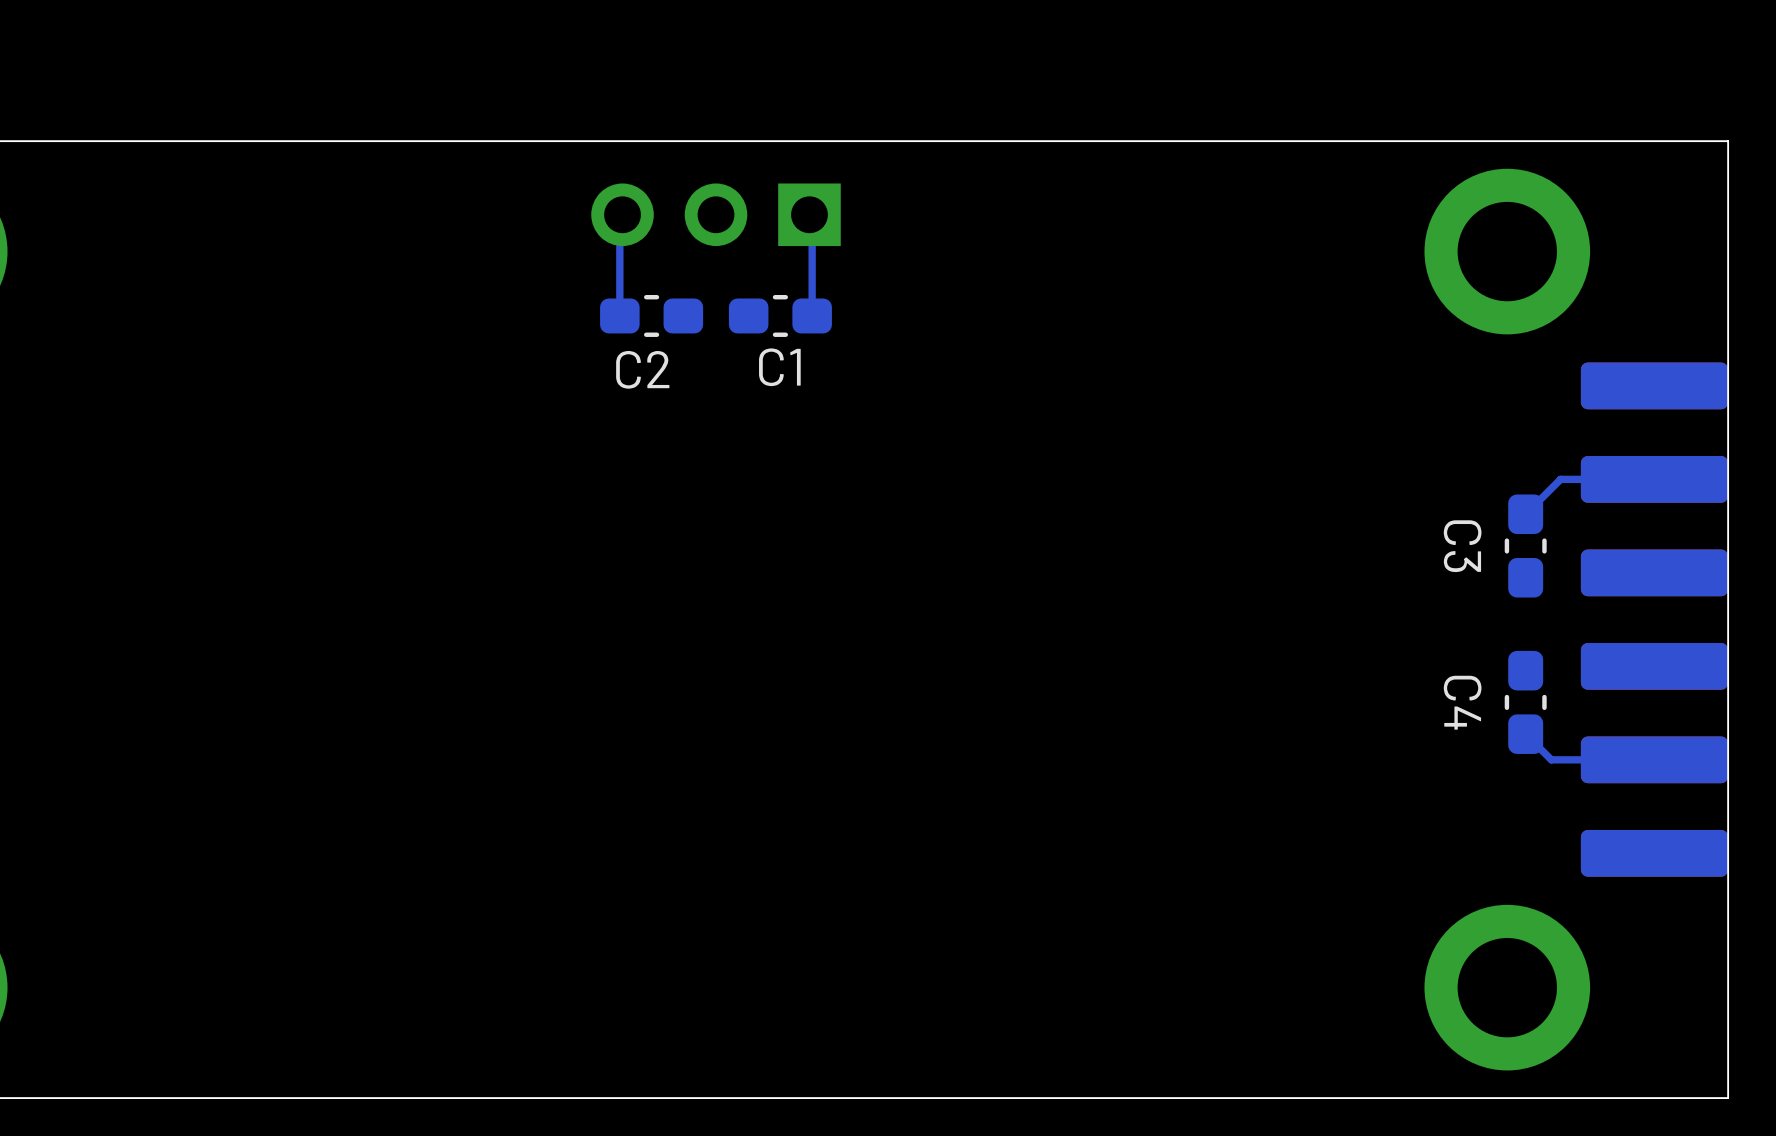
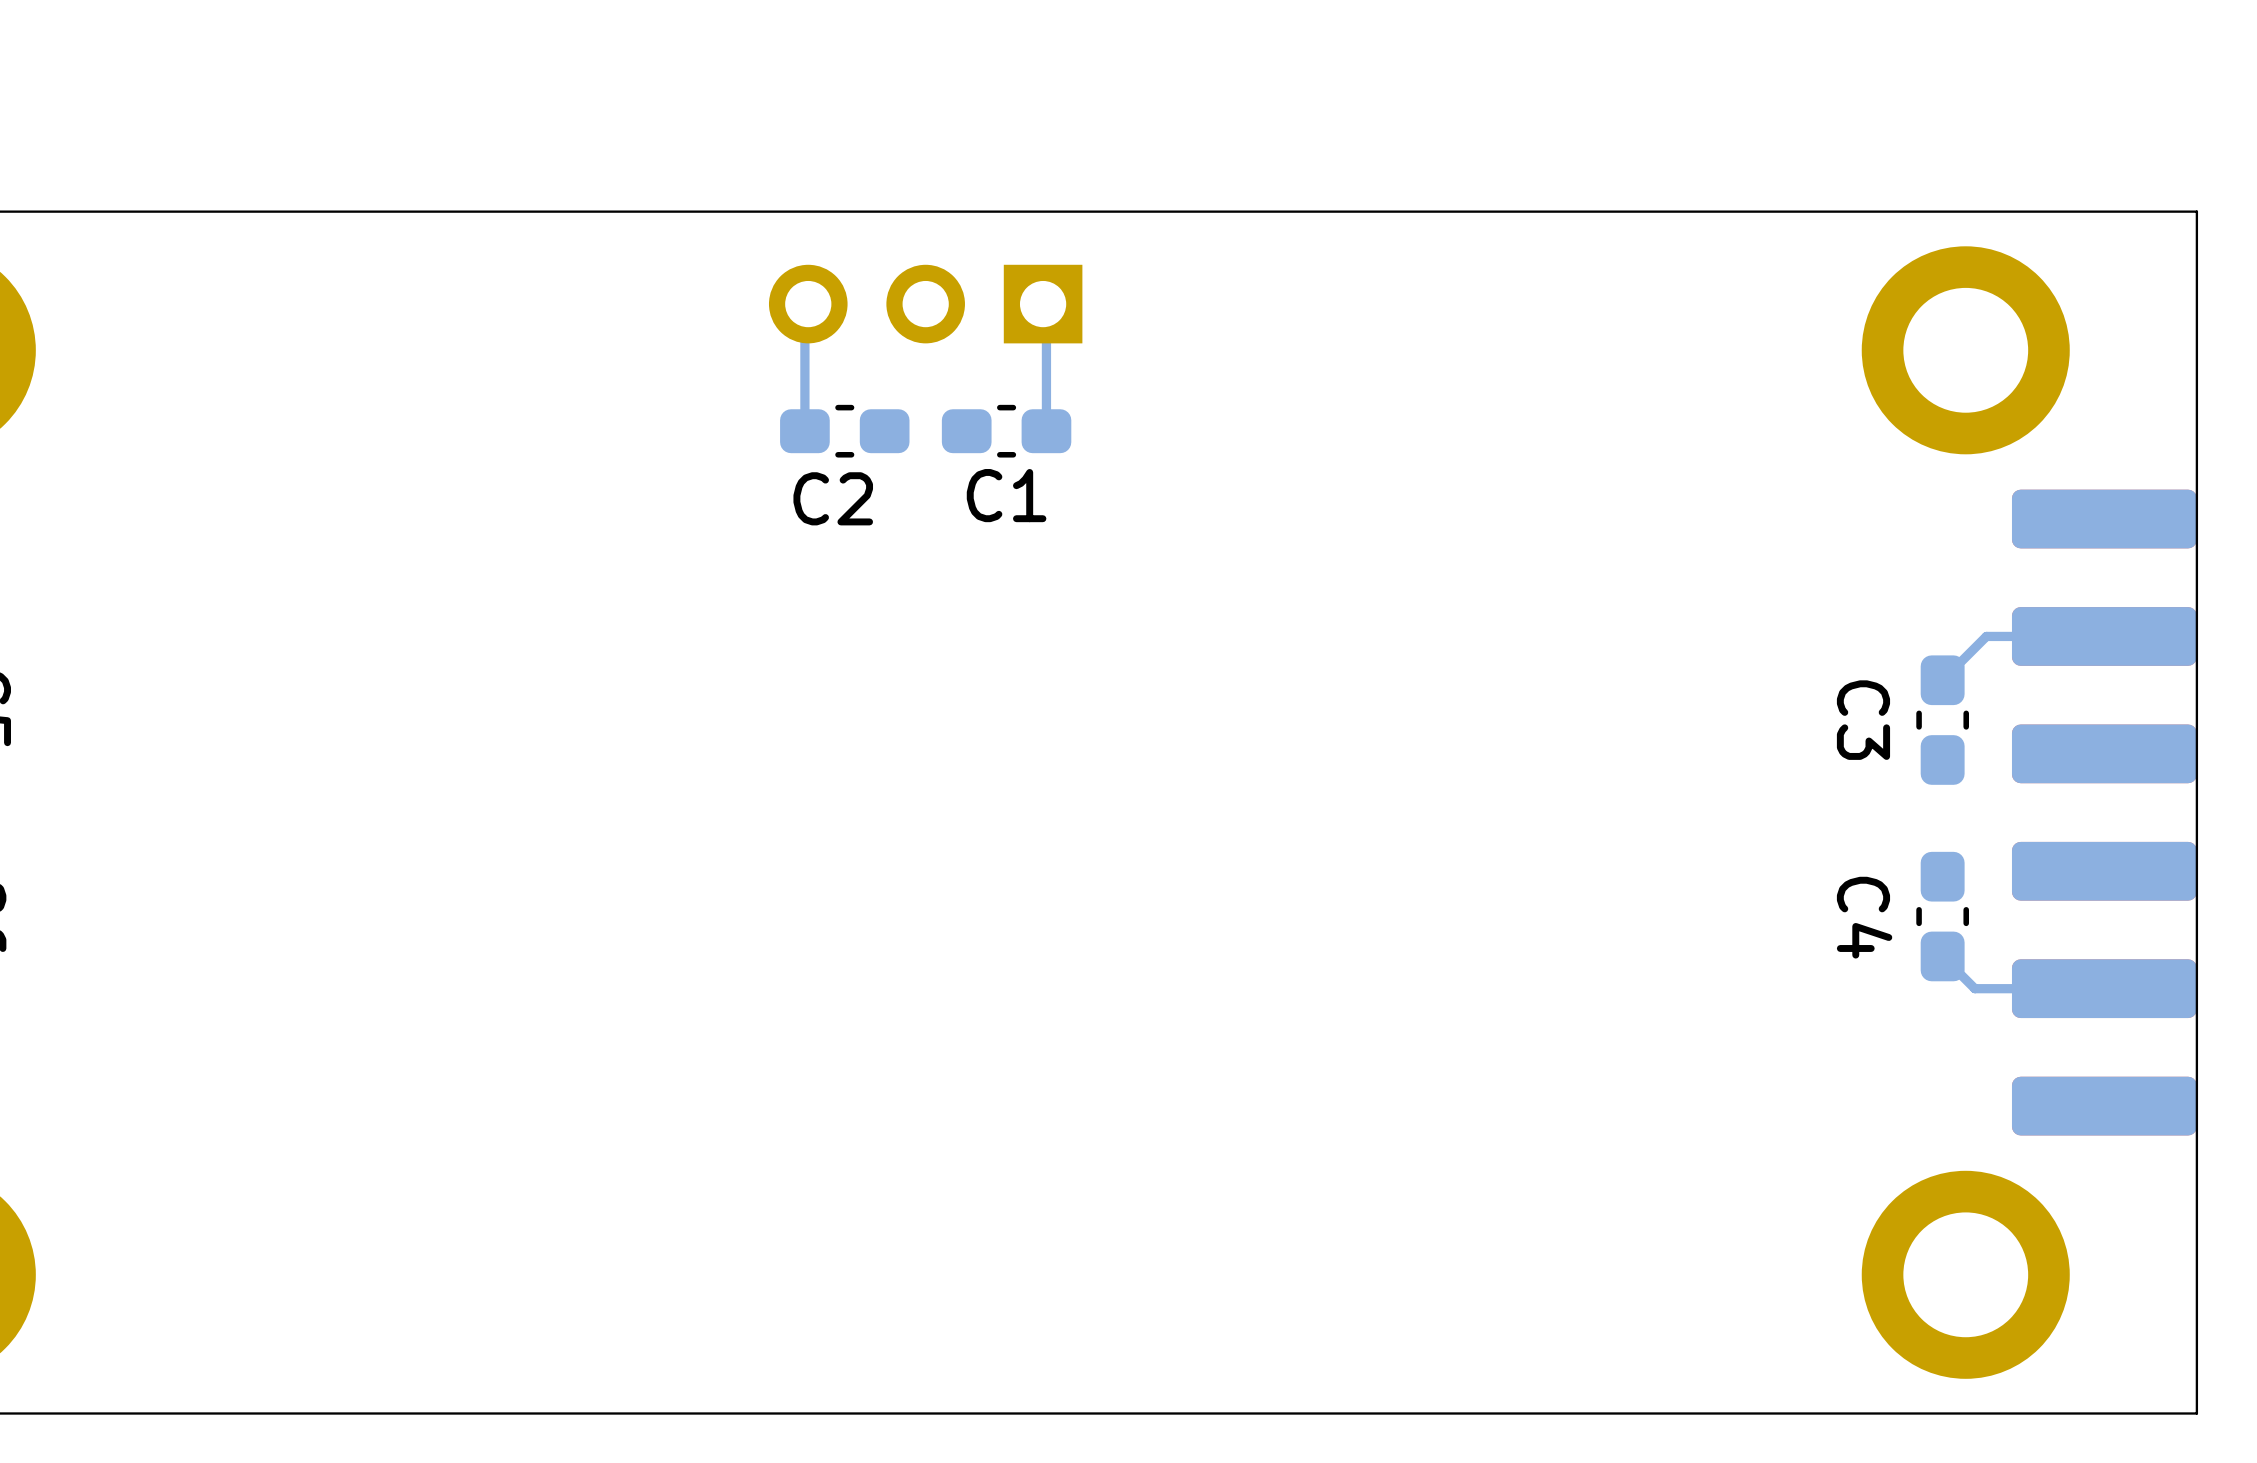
part position: (1507, 251) -> (1965, 350)
part position: (1507, 987) -> (1965, 1274)

